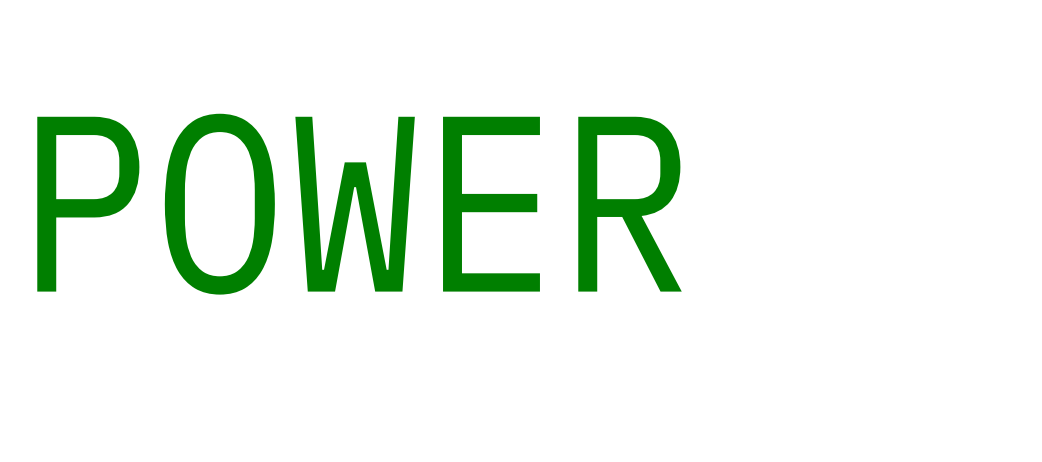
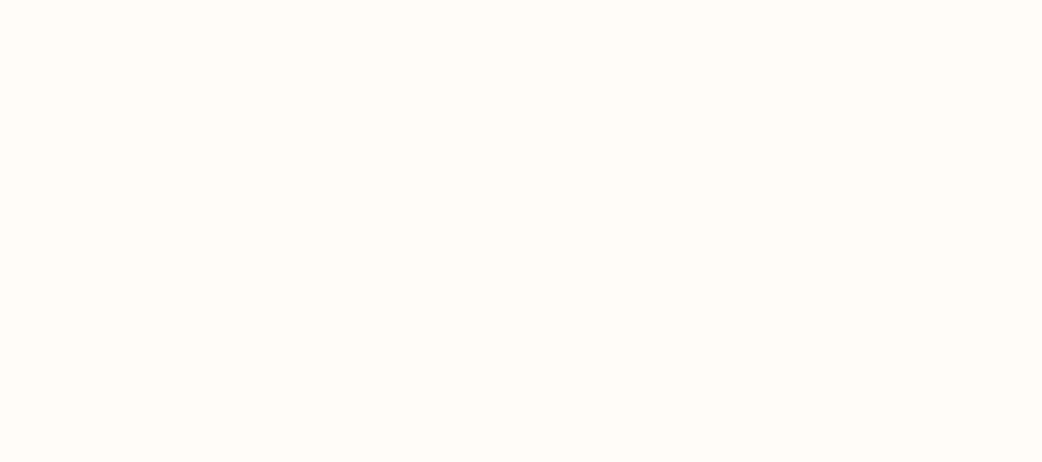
text: POWER (359, 204) -> none

